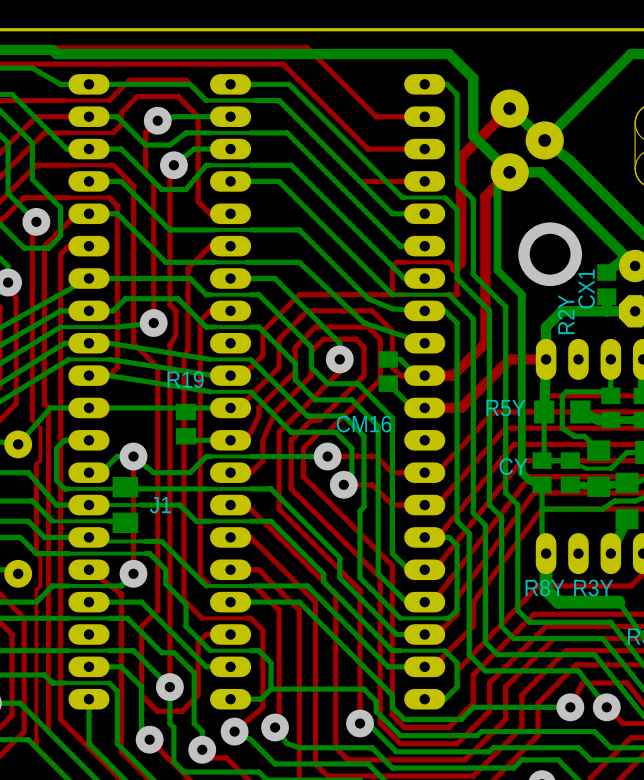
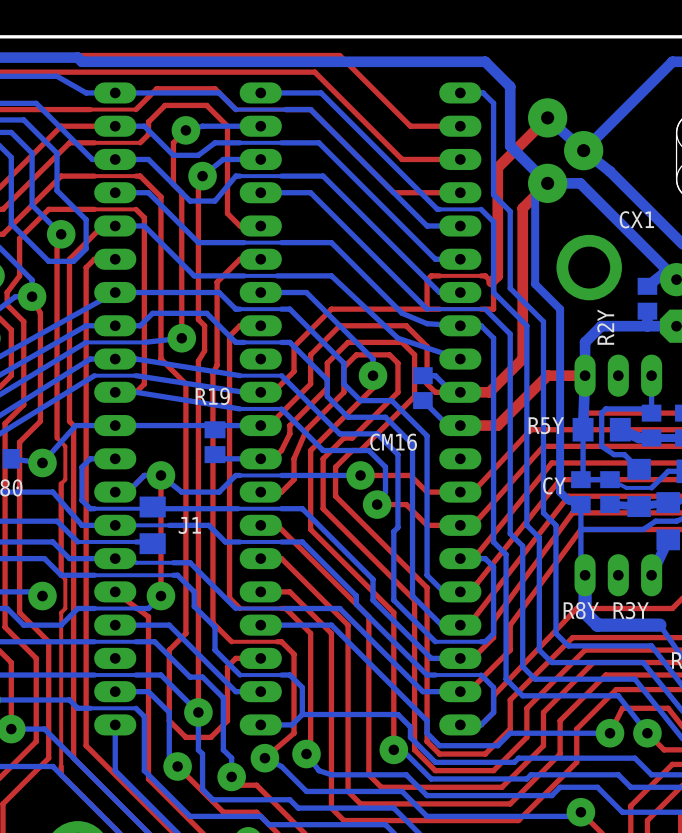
CX1 name rotation: 0° (586, 288) -> 90° clockwise (636, 219)
CX1 name position: CX1 (586, 288) -> CX1 (636, 219)

